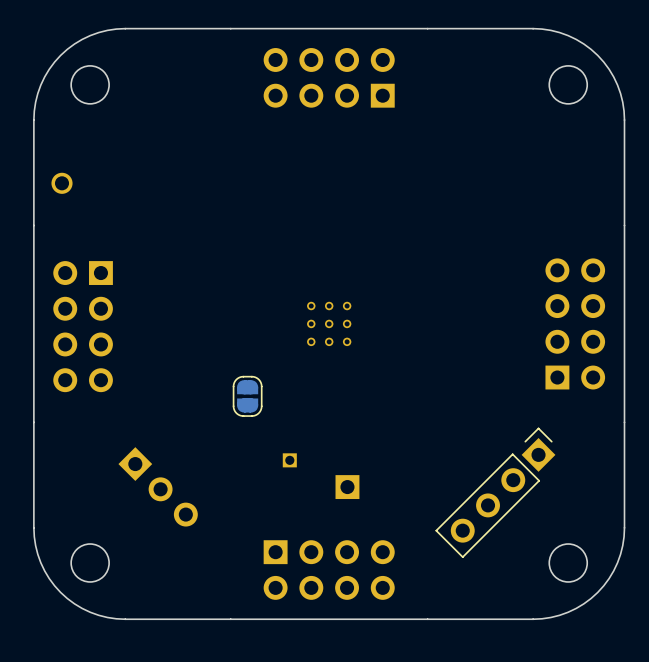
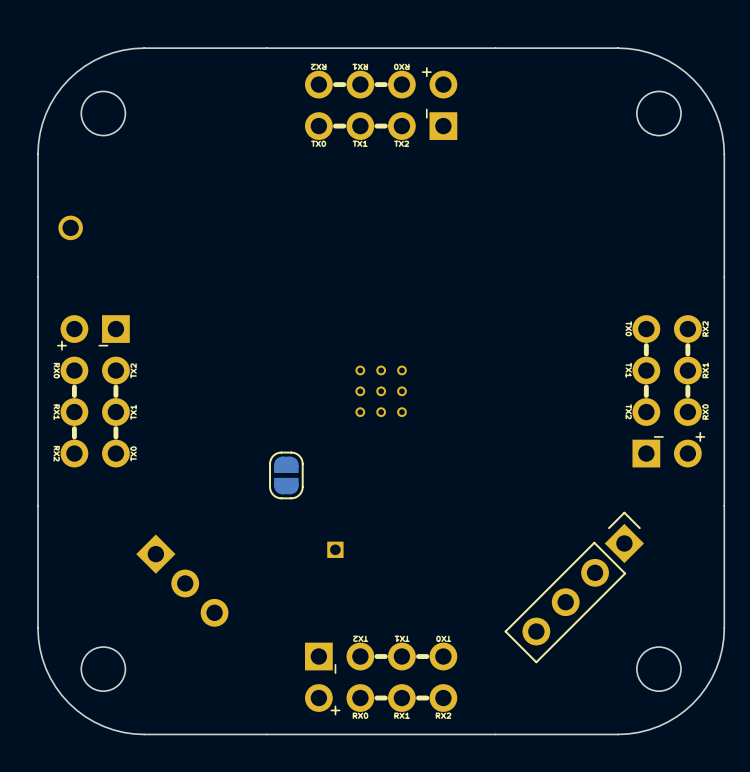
part footprint: [263, 48, 395, 108] -> [304, 67, 458, 140]
part footprint: [545, 258, 606, 390] -> [632, 315, 706, 468]
part footprint: [53, 261, 113, 393] -> [57, 315, 130, 468]
part: (347, 487) -> none
part footprint: [263, 540, 395, 600] -> [304, 642, 458, 716]

